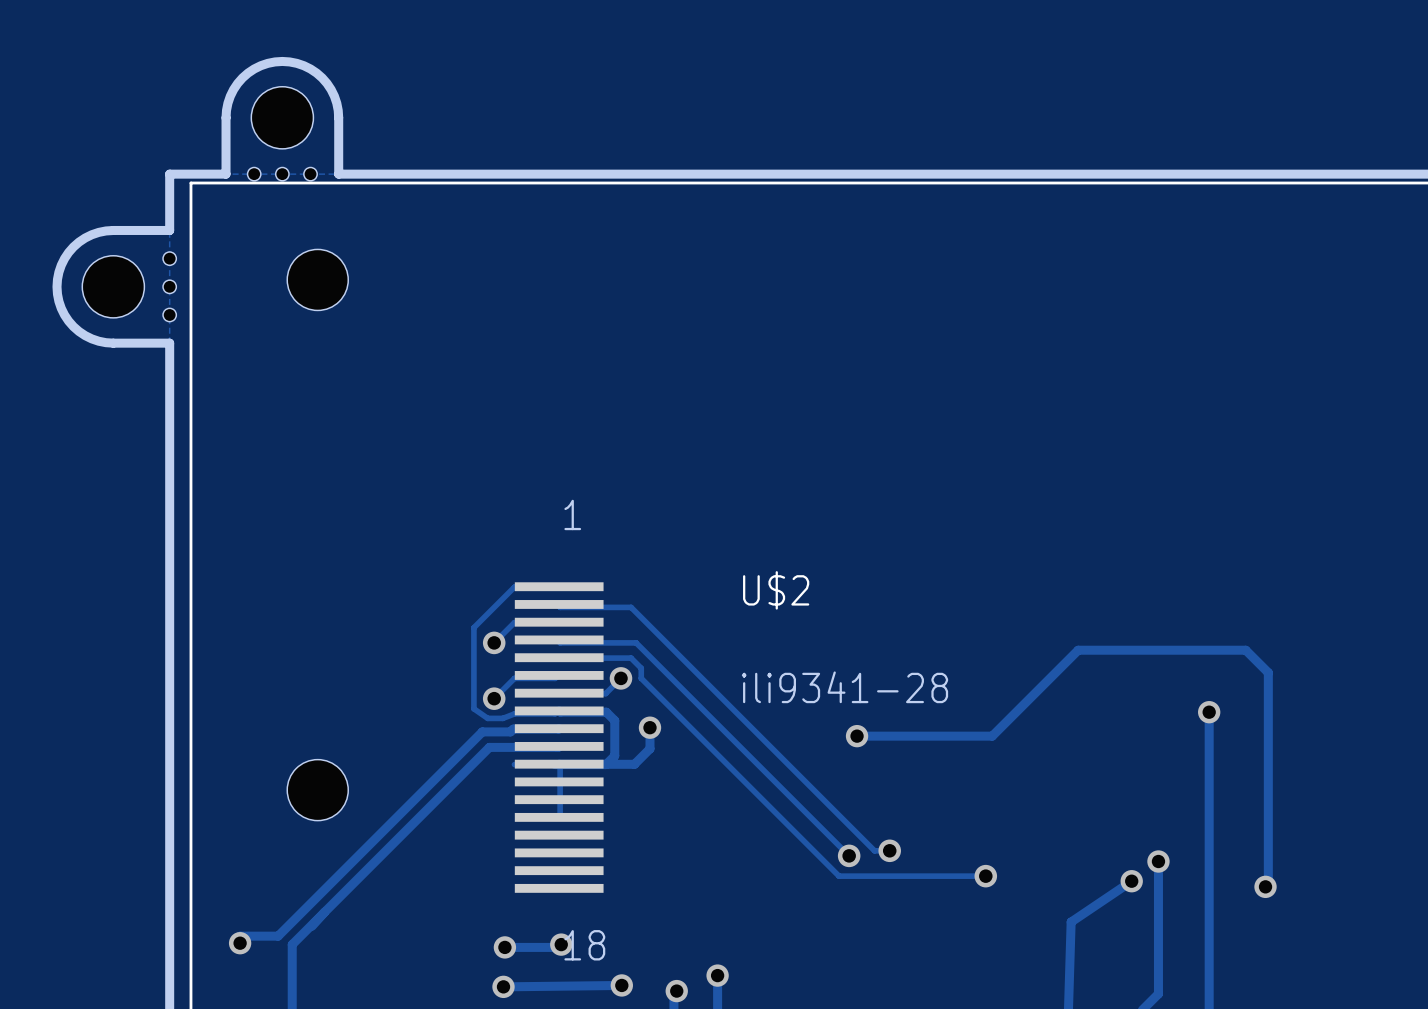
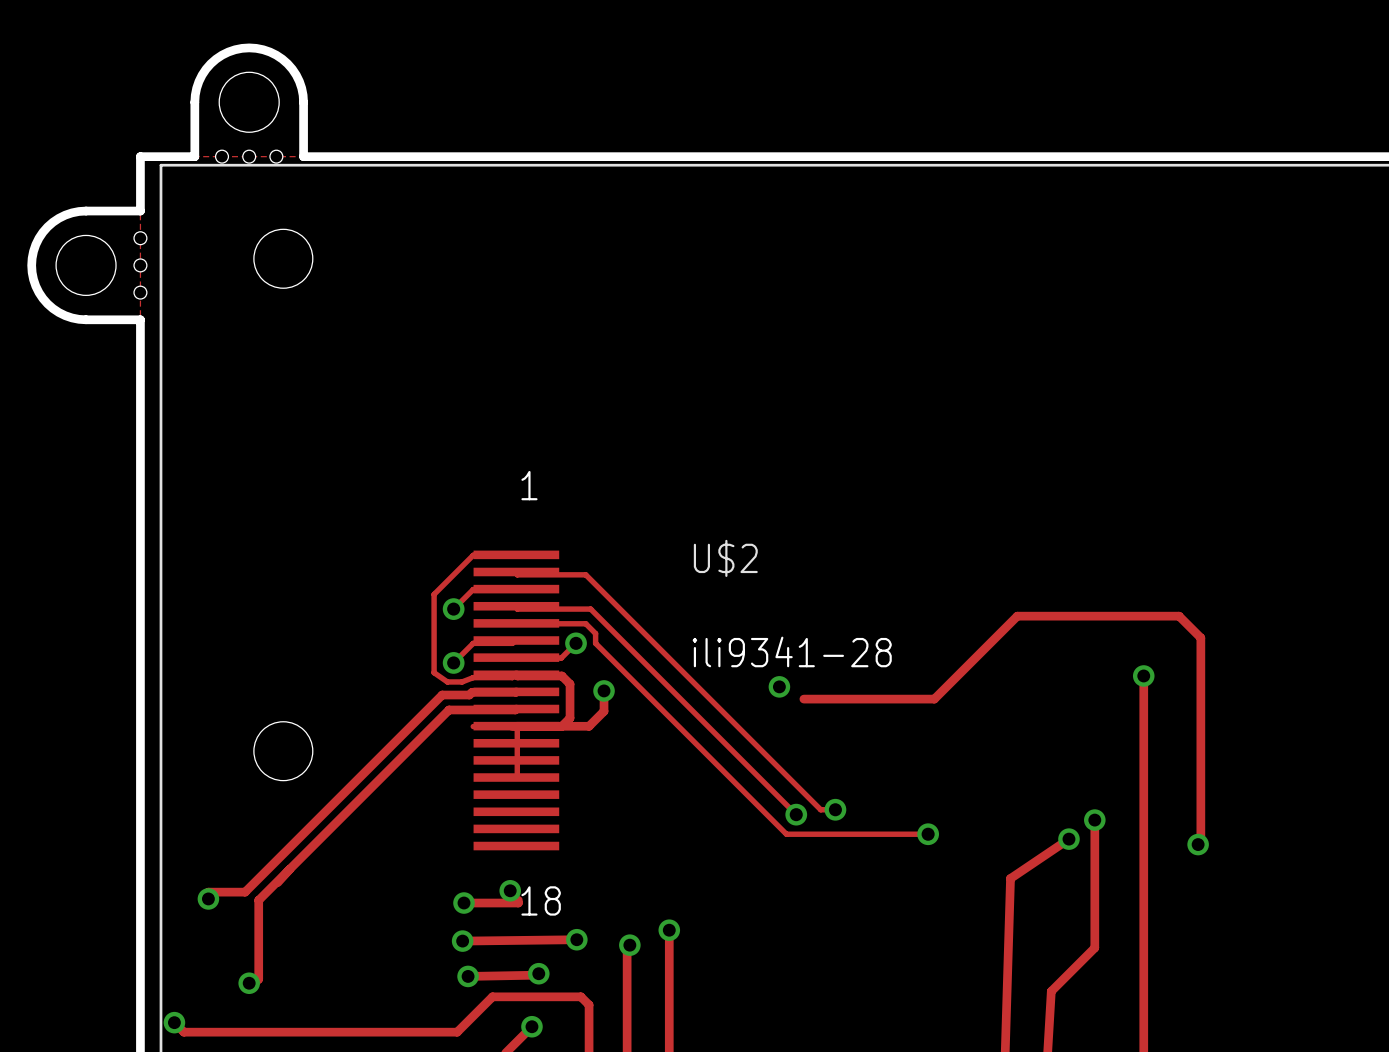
via position: (857, 736) -> (779, 686)
via position: (561, 944) -> (510, 890)

